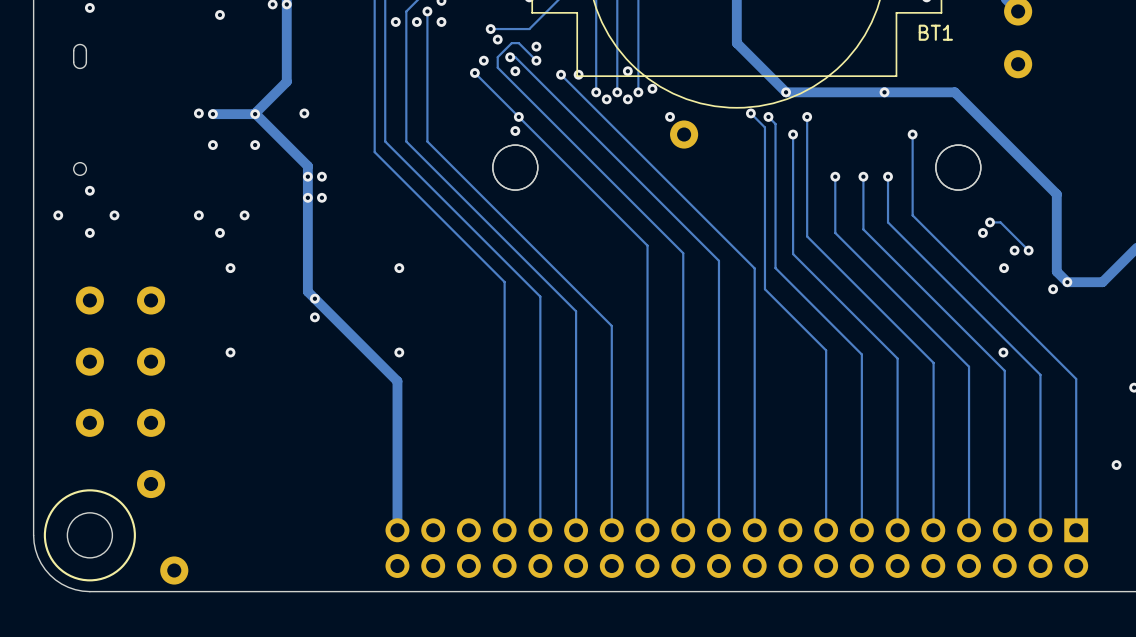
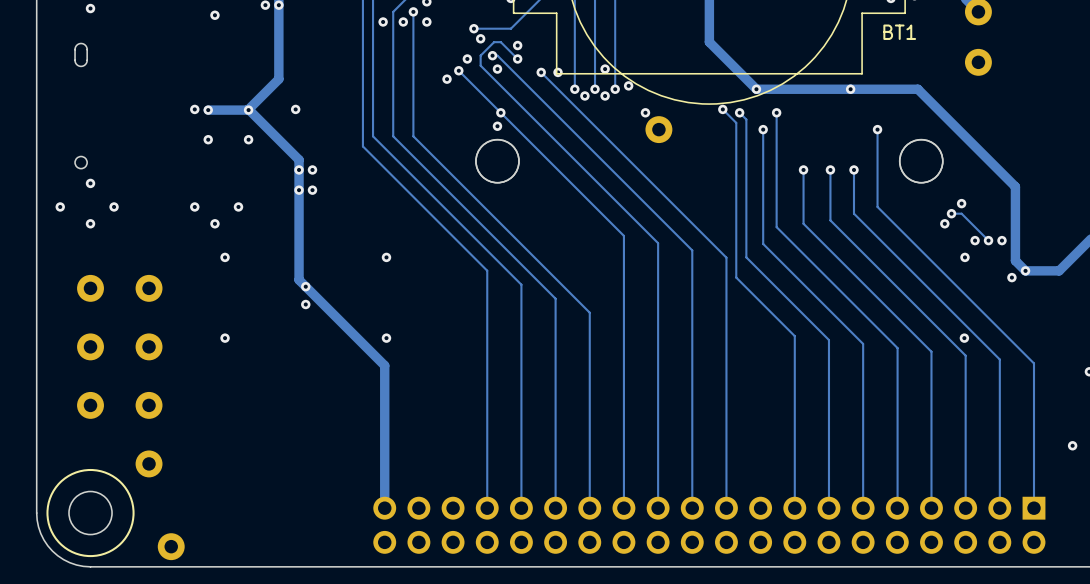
via: none -> (447, 79)
via: none -> (961, 203)
via: none -> (1001, 240)

